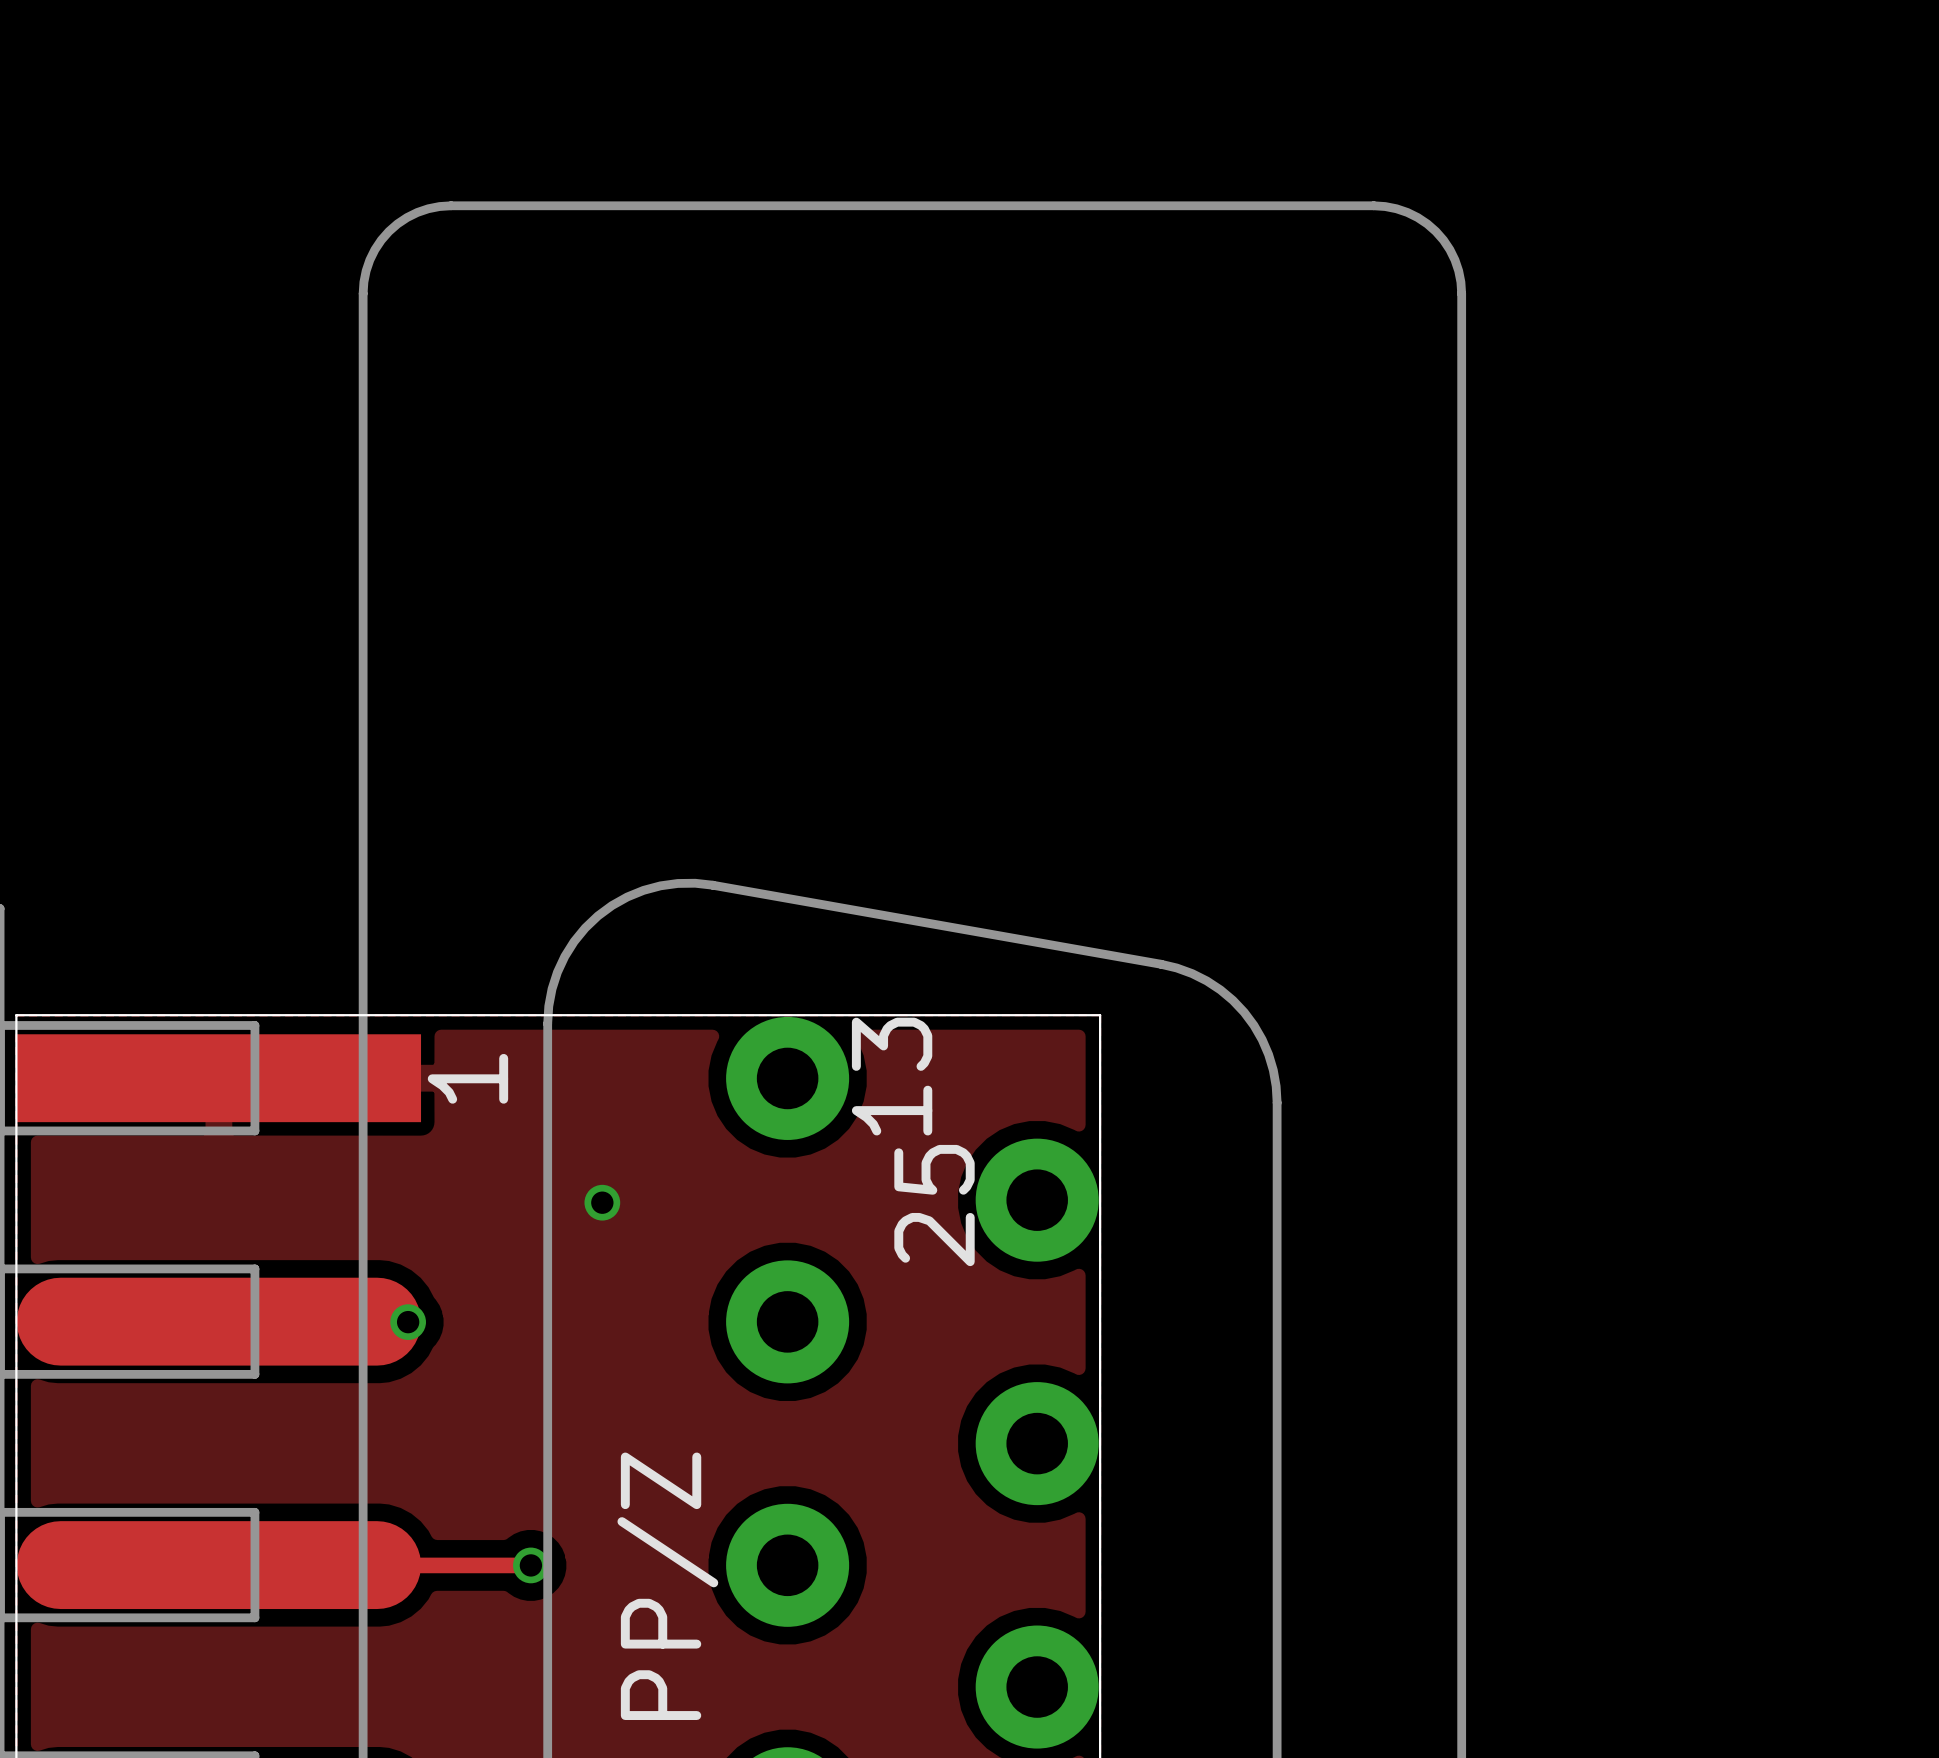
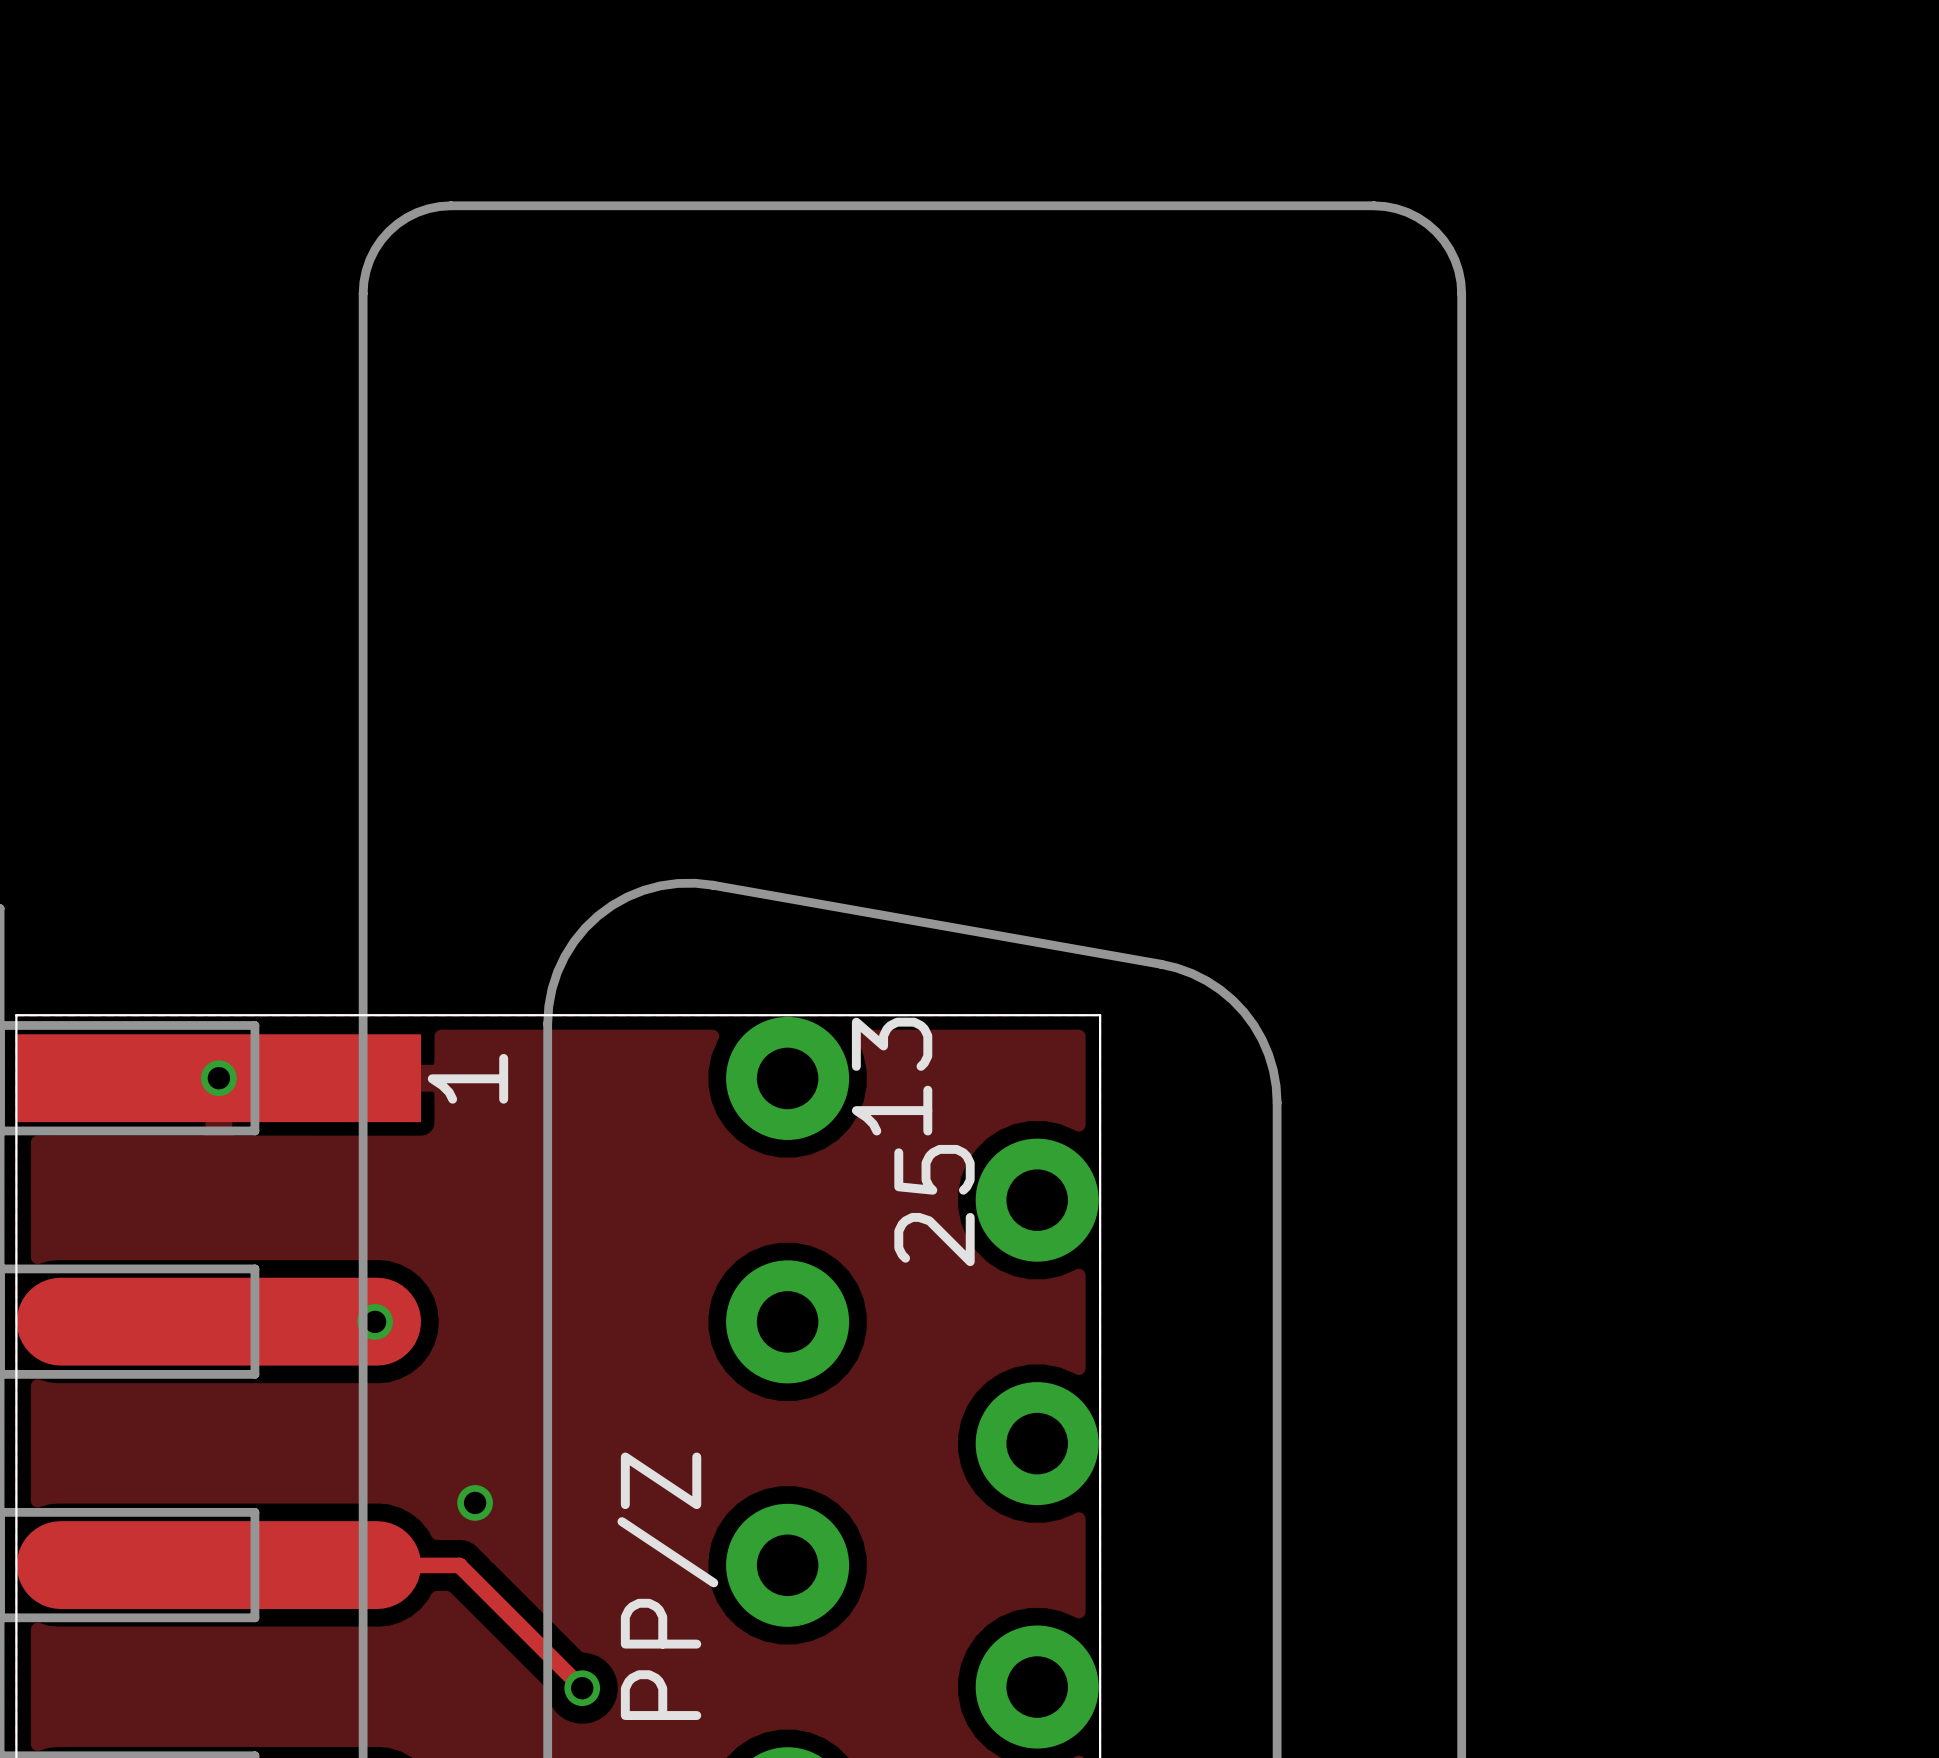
via: none -> (218, 1078)
via: (602, 1202) -> none
via position: (408, 1322) -> (375, 1321)
via: none -> (475, 1502)
track: (459, 1565) (530, 1565) -> (459, 1565) (582, 1688)
via: (530, 1565) -> none
via: none -> (582, 1688)

